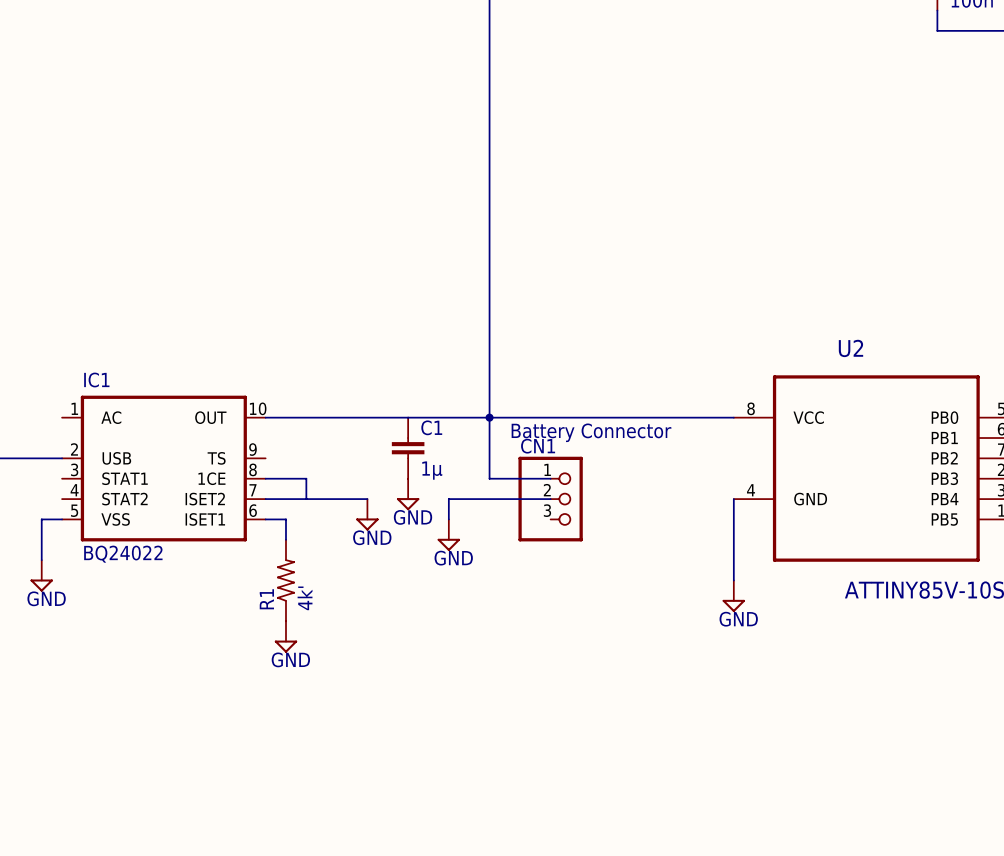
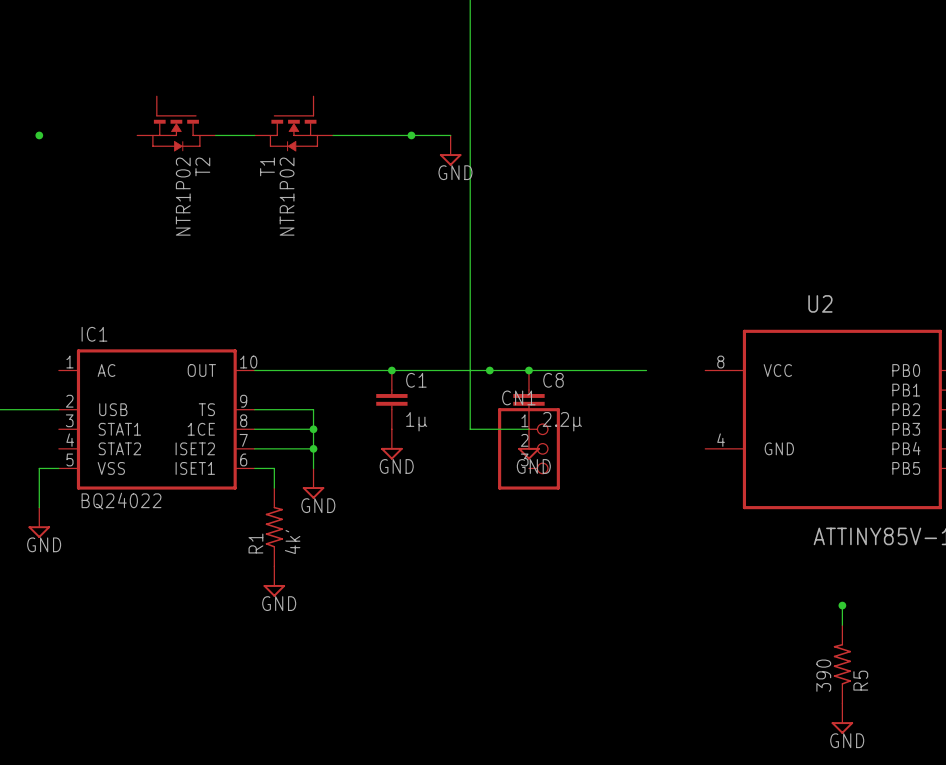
T2: none -> NTR1P02 (176, 123)
T1: none -> NTR1P02 (293, 123)
junction: none -> (39, 135)
wire: none -> (215, 135) (254, 135)
wire: none -> (333, 135) (450, 135)
junction: none -> (411, 135)
power symbol: none -> GND (450, 150)
junction: none -> (391, 370)
junction position: (489, 417) -> (489, 370)
junction: none -> (528, 370)
wire: (672, 417) (733, 417) -> none
text: Battery Connector (591, 432) -> none
C8: none -> 2.2µ (528, 399)
wire: none -> (254, 409) (313, 409) (313, 468)
wire: (306, 478) (306, 499) -> (293, 429) (313, 429)
junction: none -> (313, 429)
power symbol: none -> GND (528, 444)
wire: (326, 499) (367, 499) -> none
junction: none -> (313, 448)
wire: (550, 499) (448, 499) (448, 519) -> none
wire: (733, 499) (733, 580) -> none
power symbol position: GND (367, 514) -> GND (313, 483)
power symbol: GND (448, 535) -> none
power symbol: GND (733, 596) -> none
wire: none -> (842, 605) (842, 625)
junction: none -> (842, 605)
R5: none -> 390 (842, 664)
power symbol: none -> GND (842, 718)

